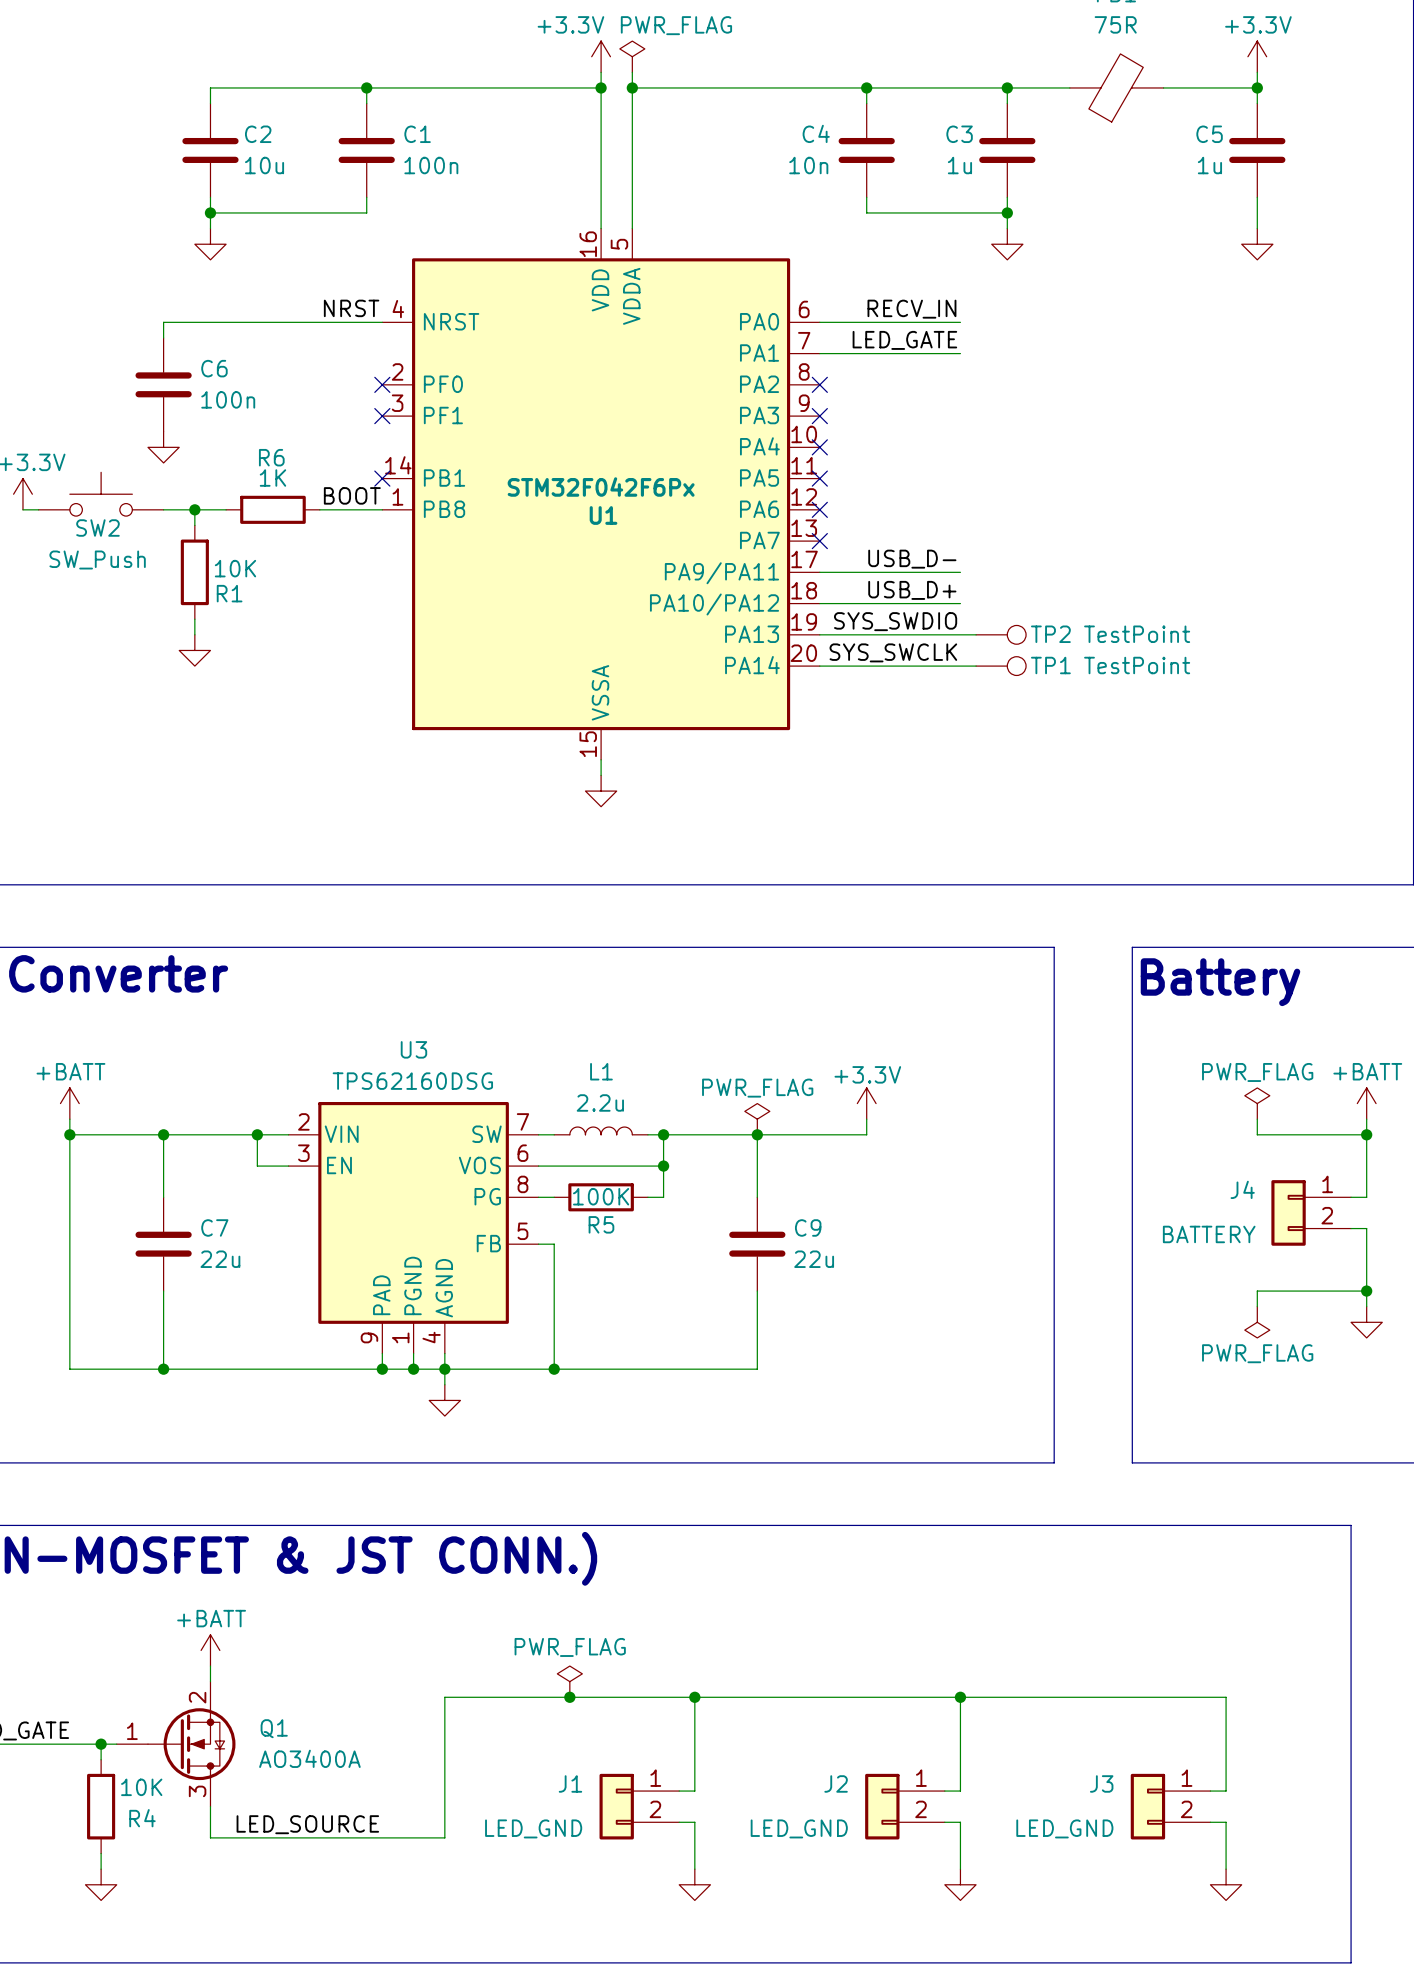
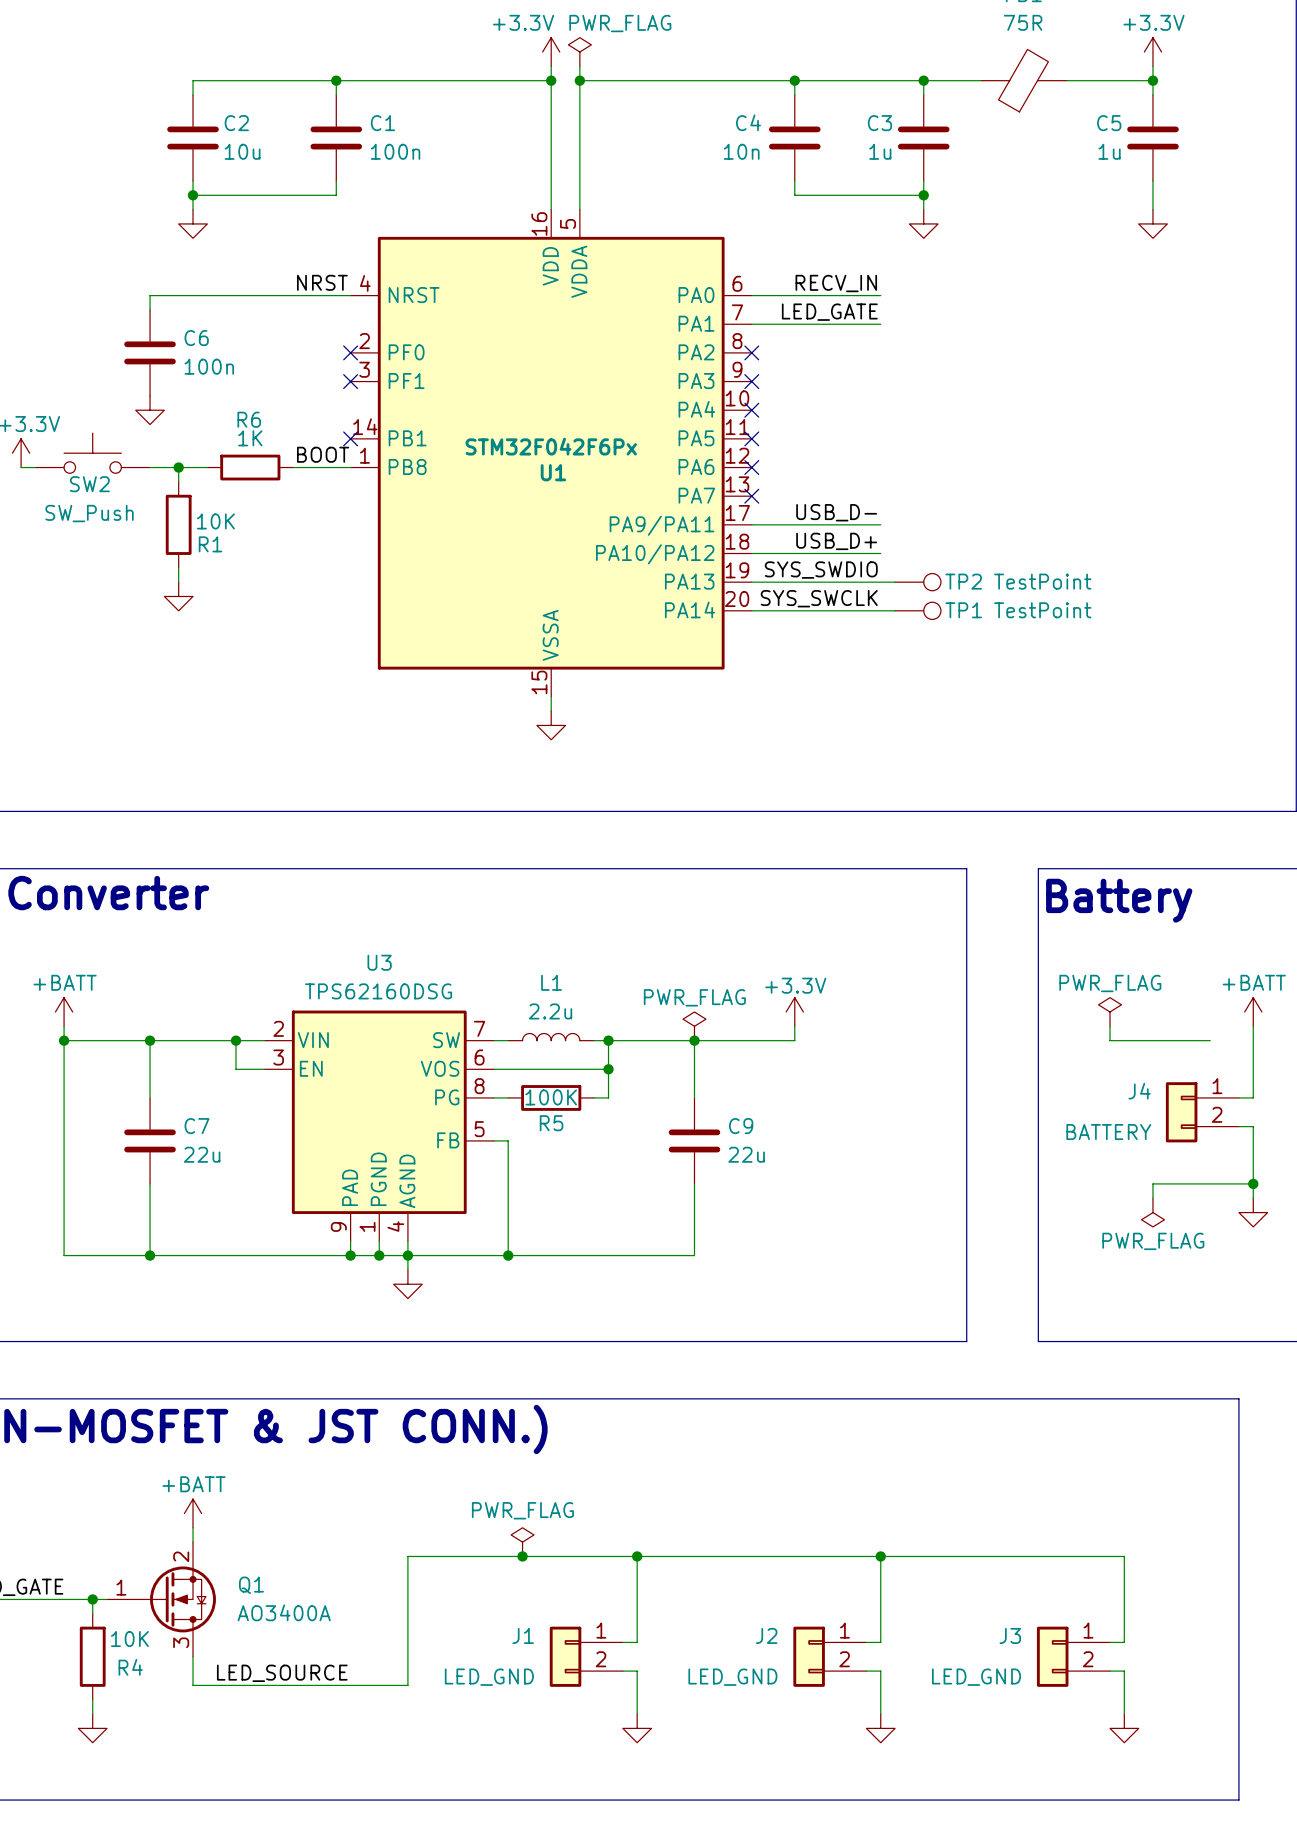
power symbol position: PWR_FLAG (1257, 1103) -> PWR_FLAG (1110, 1012)
wire: (1257, 1119) (1257, 1134) -> (1110, 1026) (1110, 1040) (1152, 1040)
wire: (1319, 1134) (1366, 1134) -> none
junction: (1366, 1134) -> none

